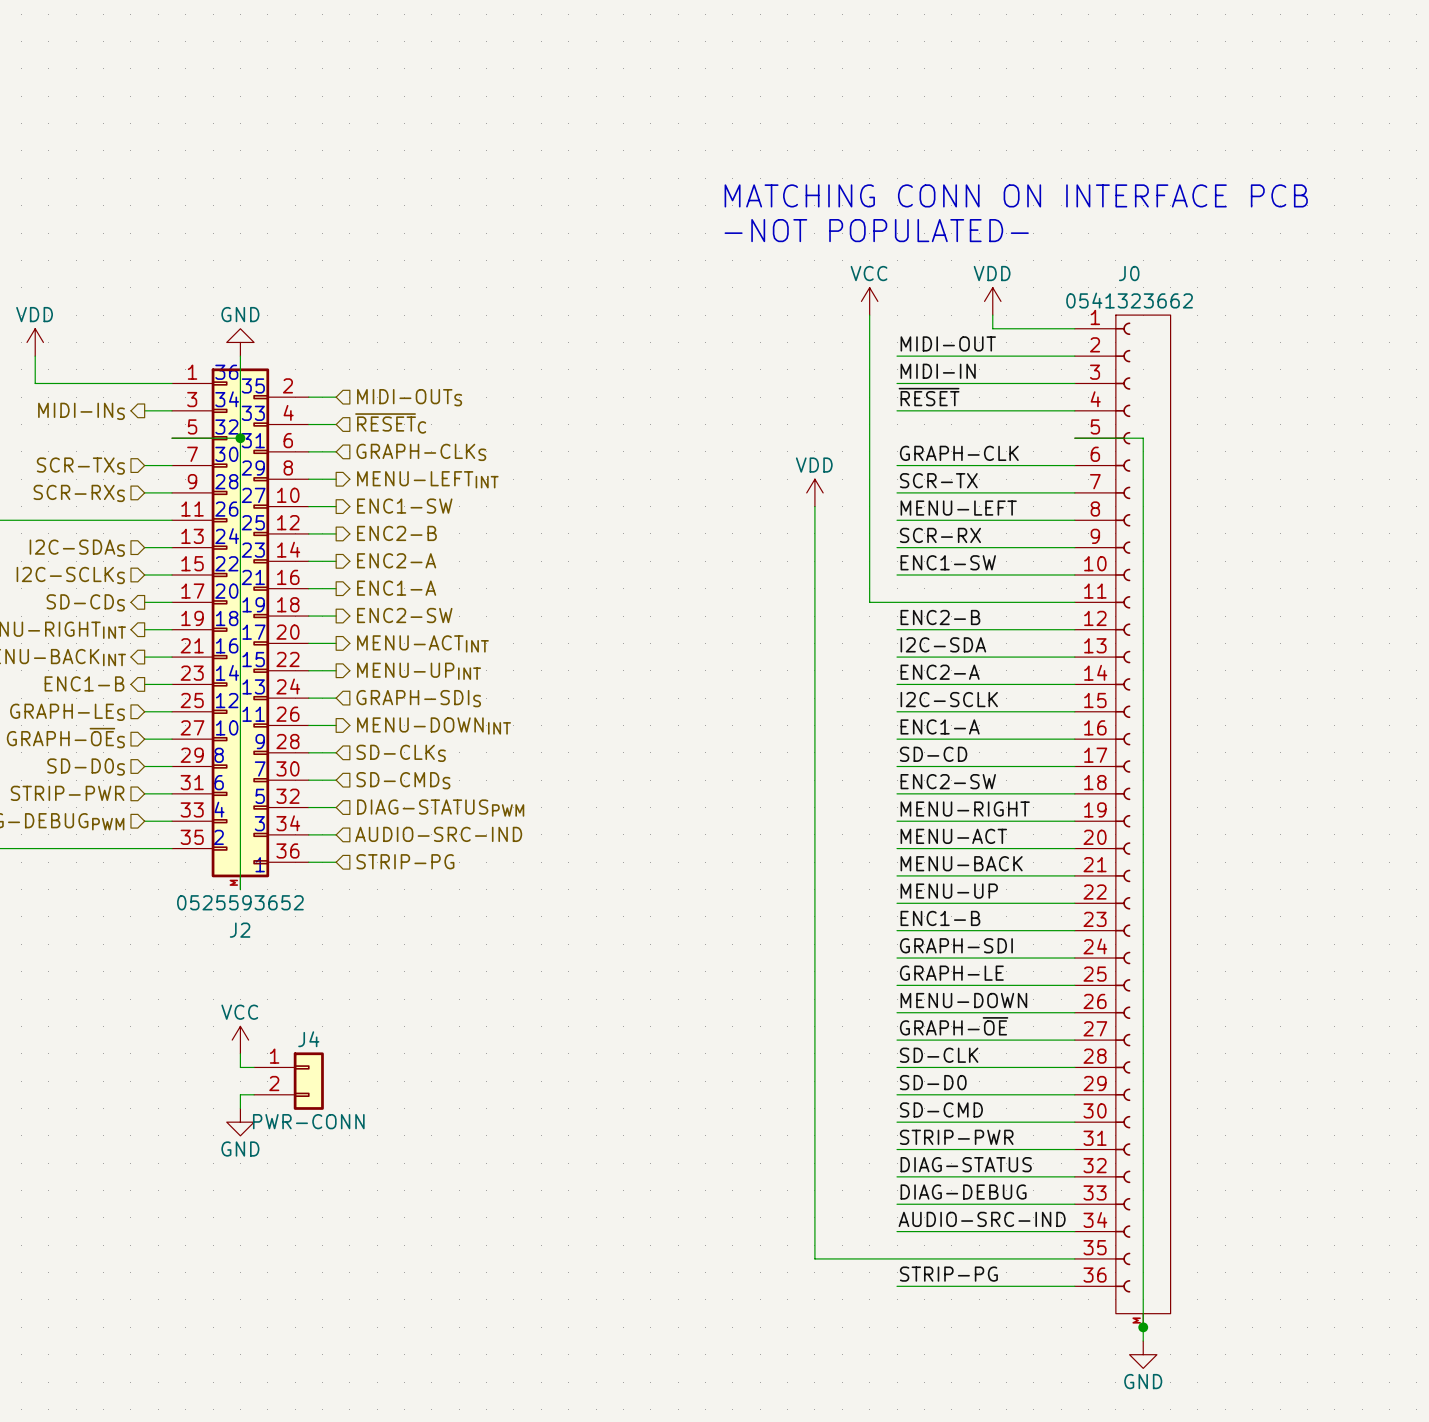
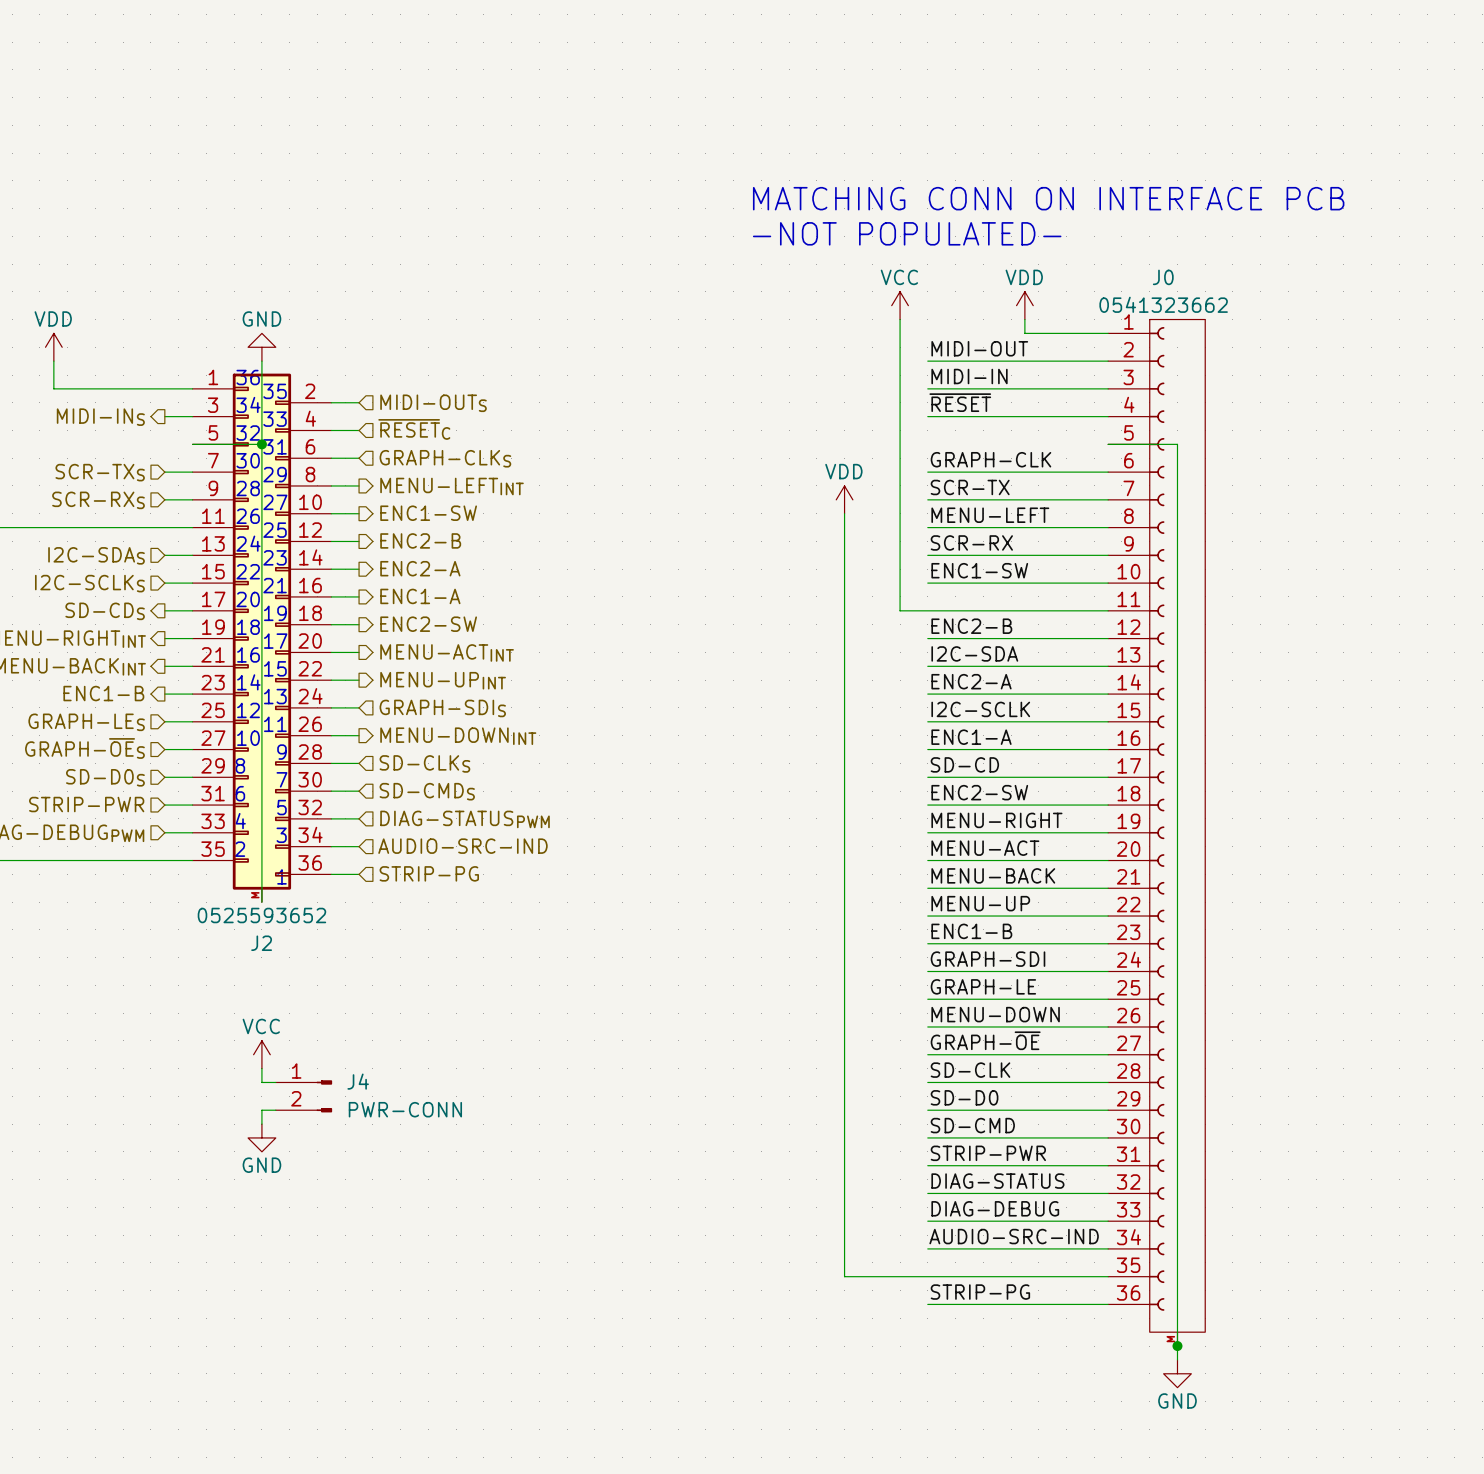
J4 name position: J4 (308, 1039) -> J4 (358, 1081)
J4 symbol: [254, 1052, 324, 1110] -> [275, 1080, 333, 1113]
J4 value position: PWR-CONN (308, 1121) -> PWR-CONN (405, 1109)

